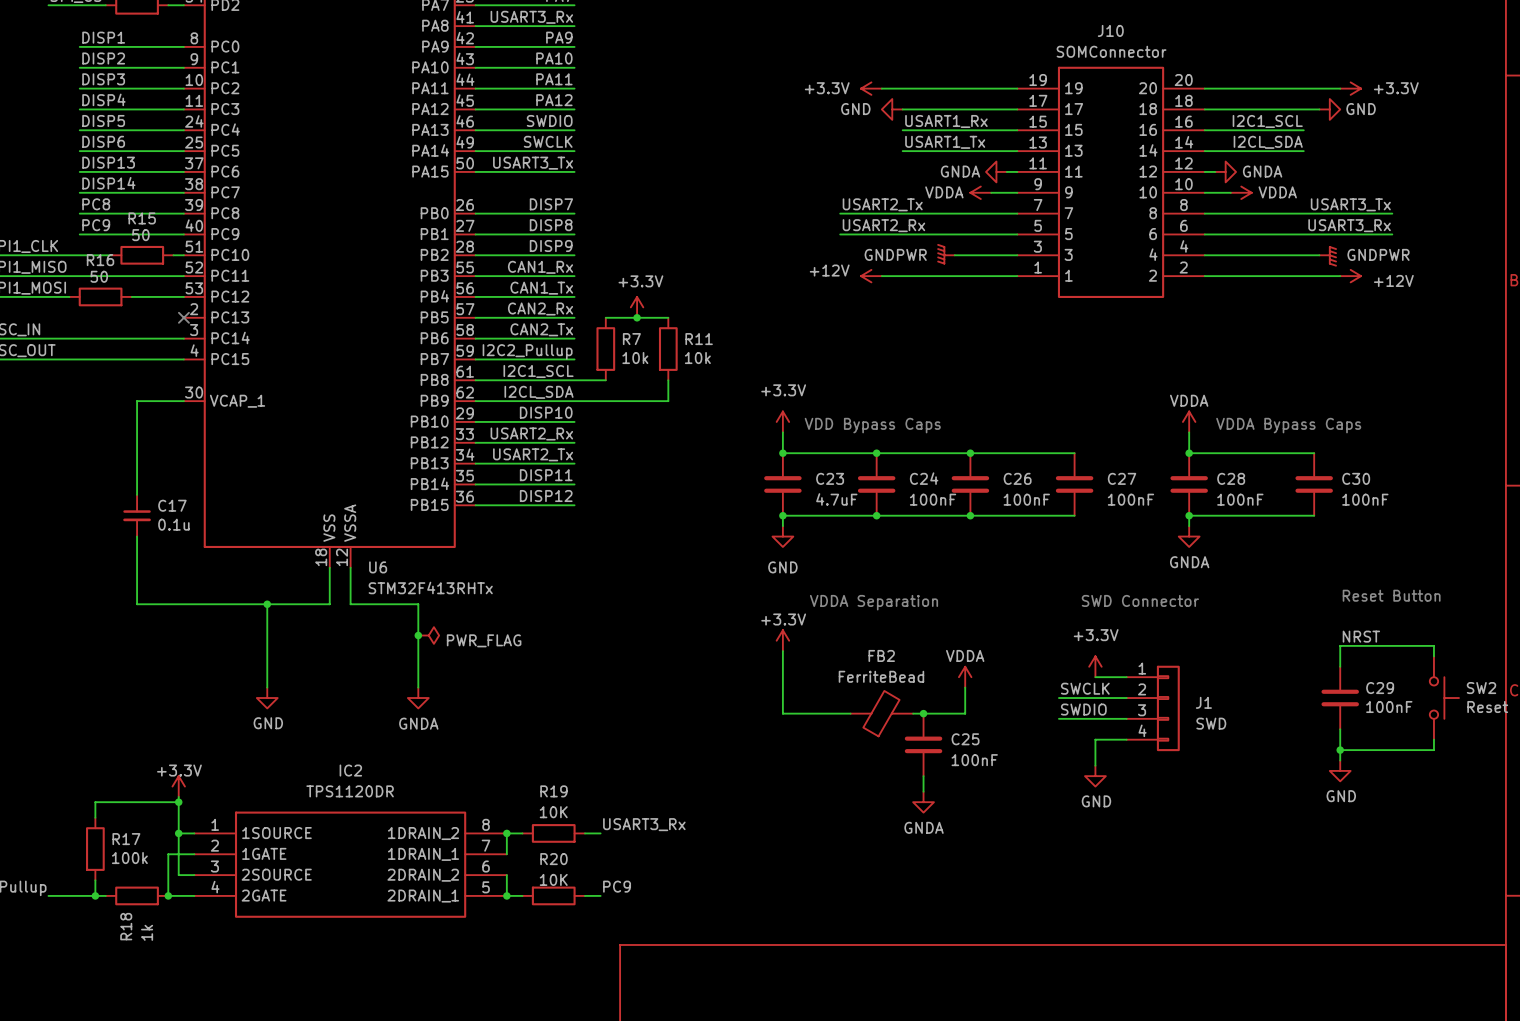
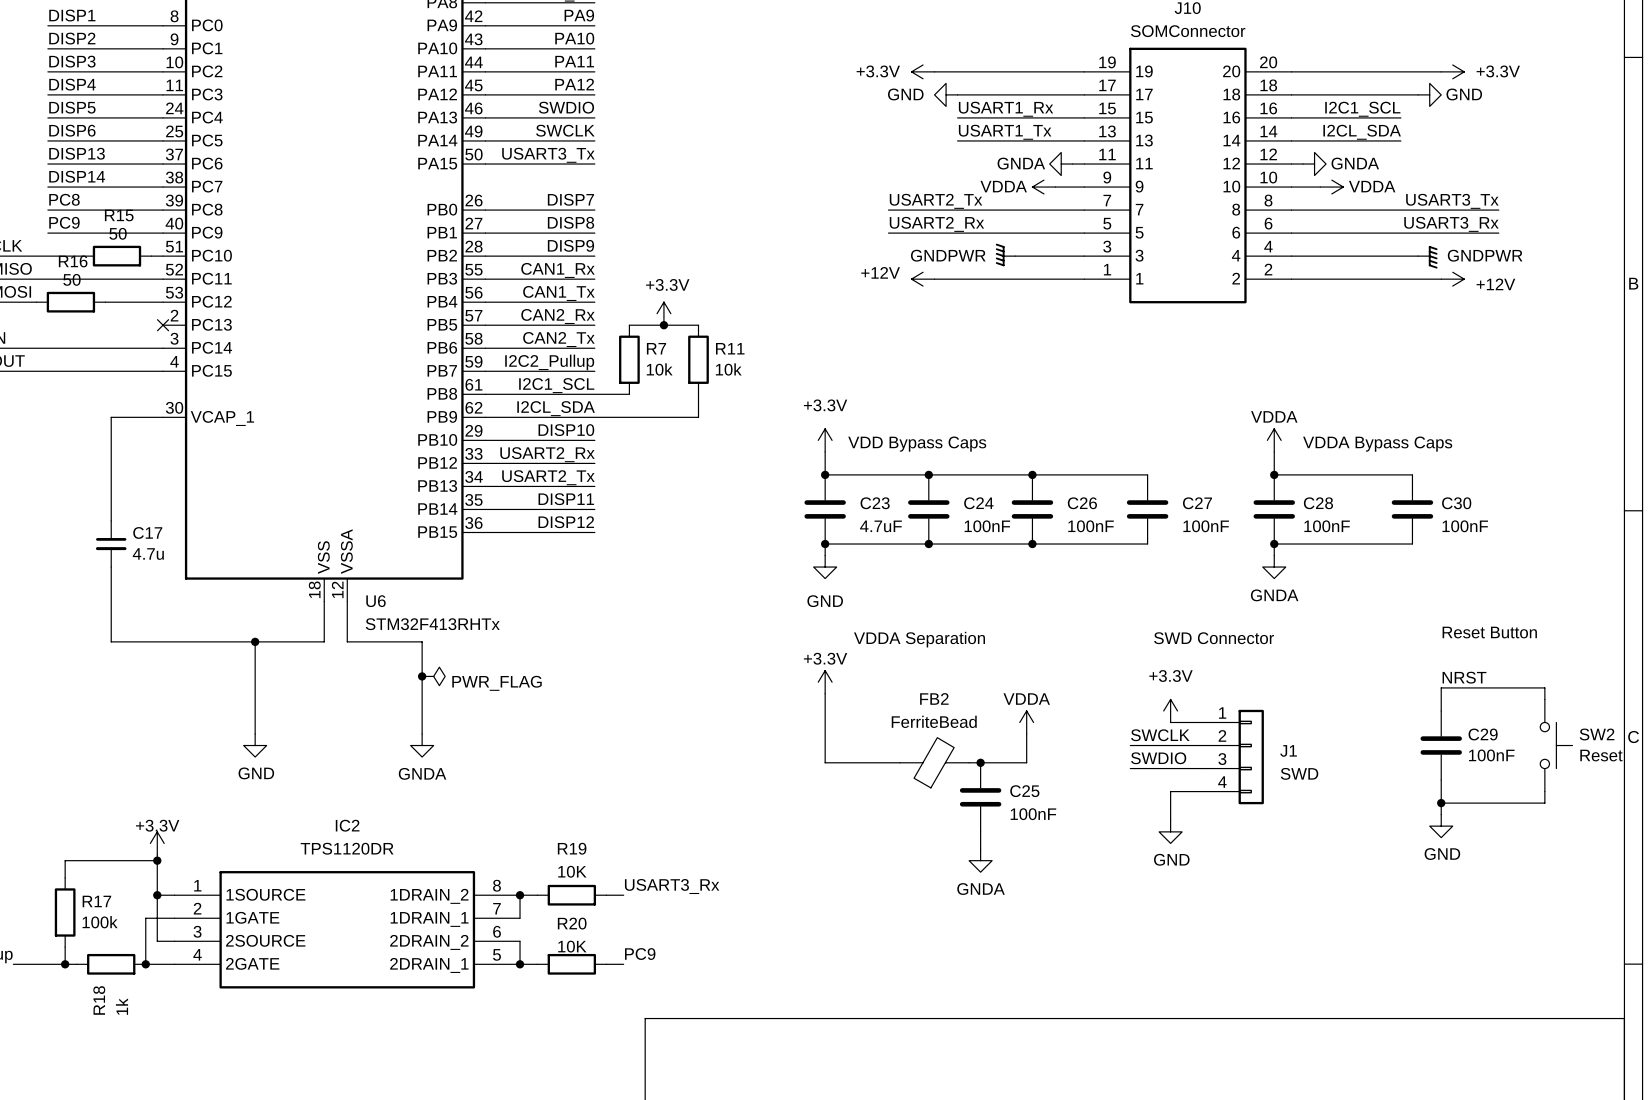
C17 value: 0.1u (173, 524) -> 4.7u (148, 554)

